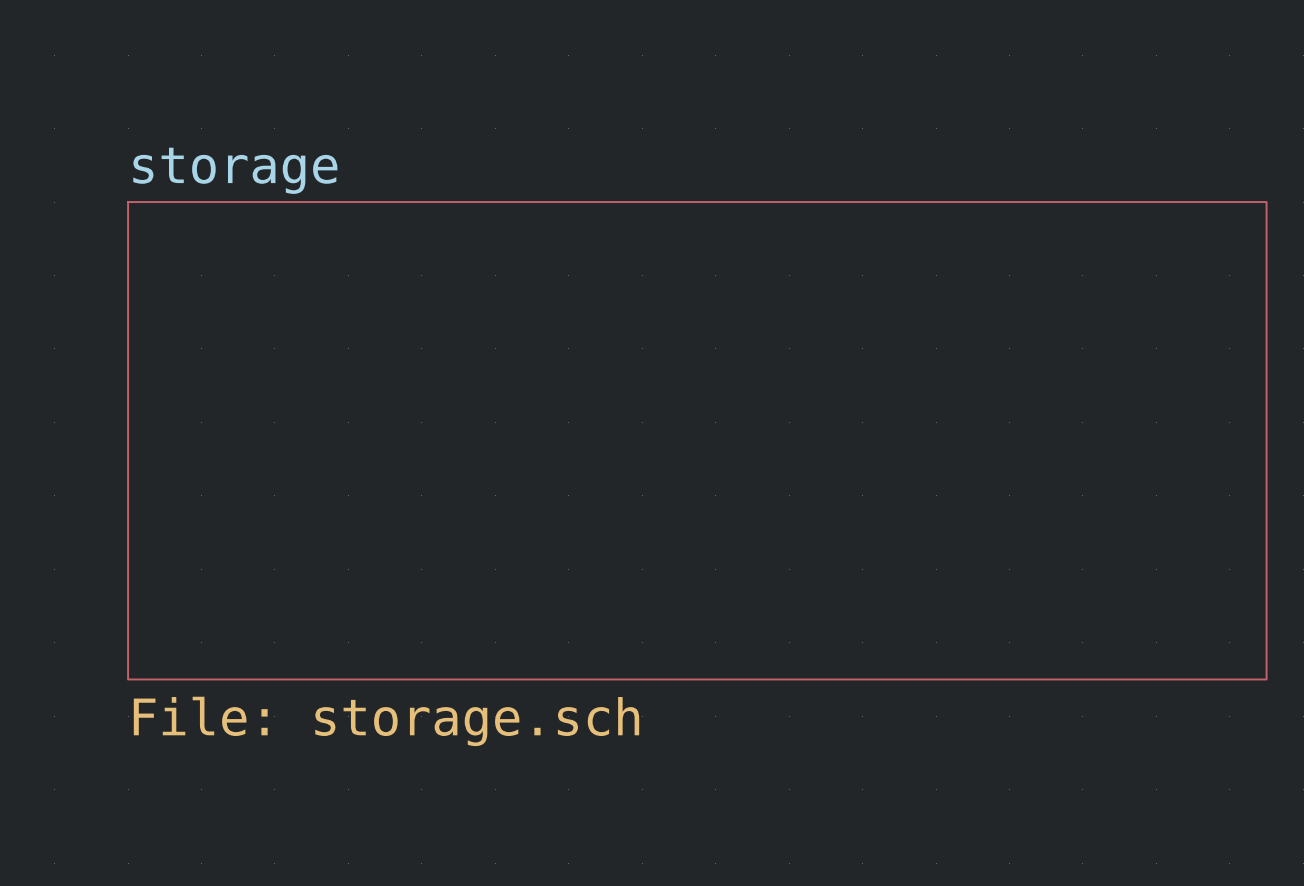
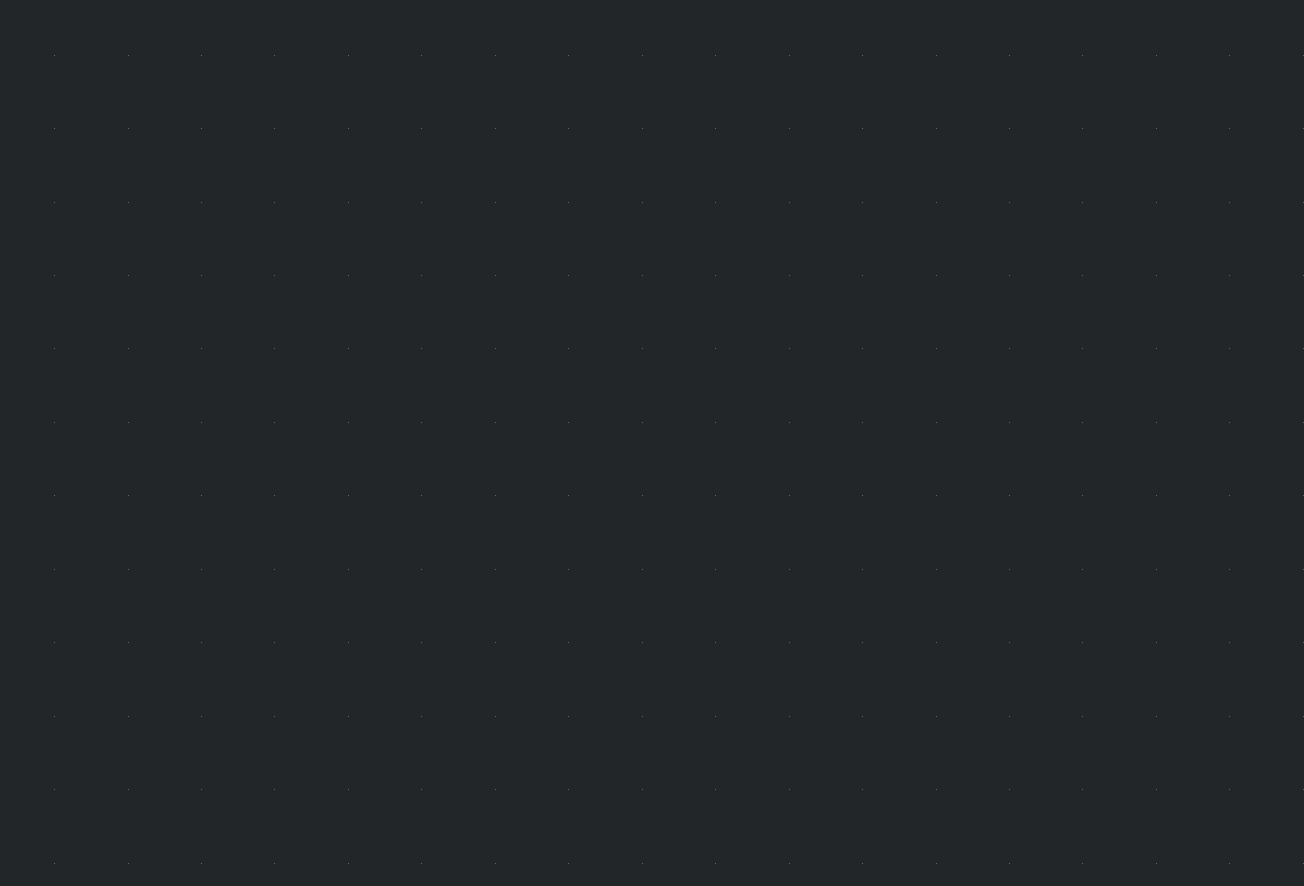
sheet storage: File: storage.sch (697, 440) -> none

